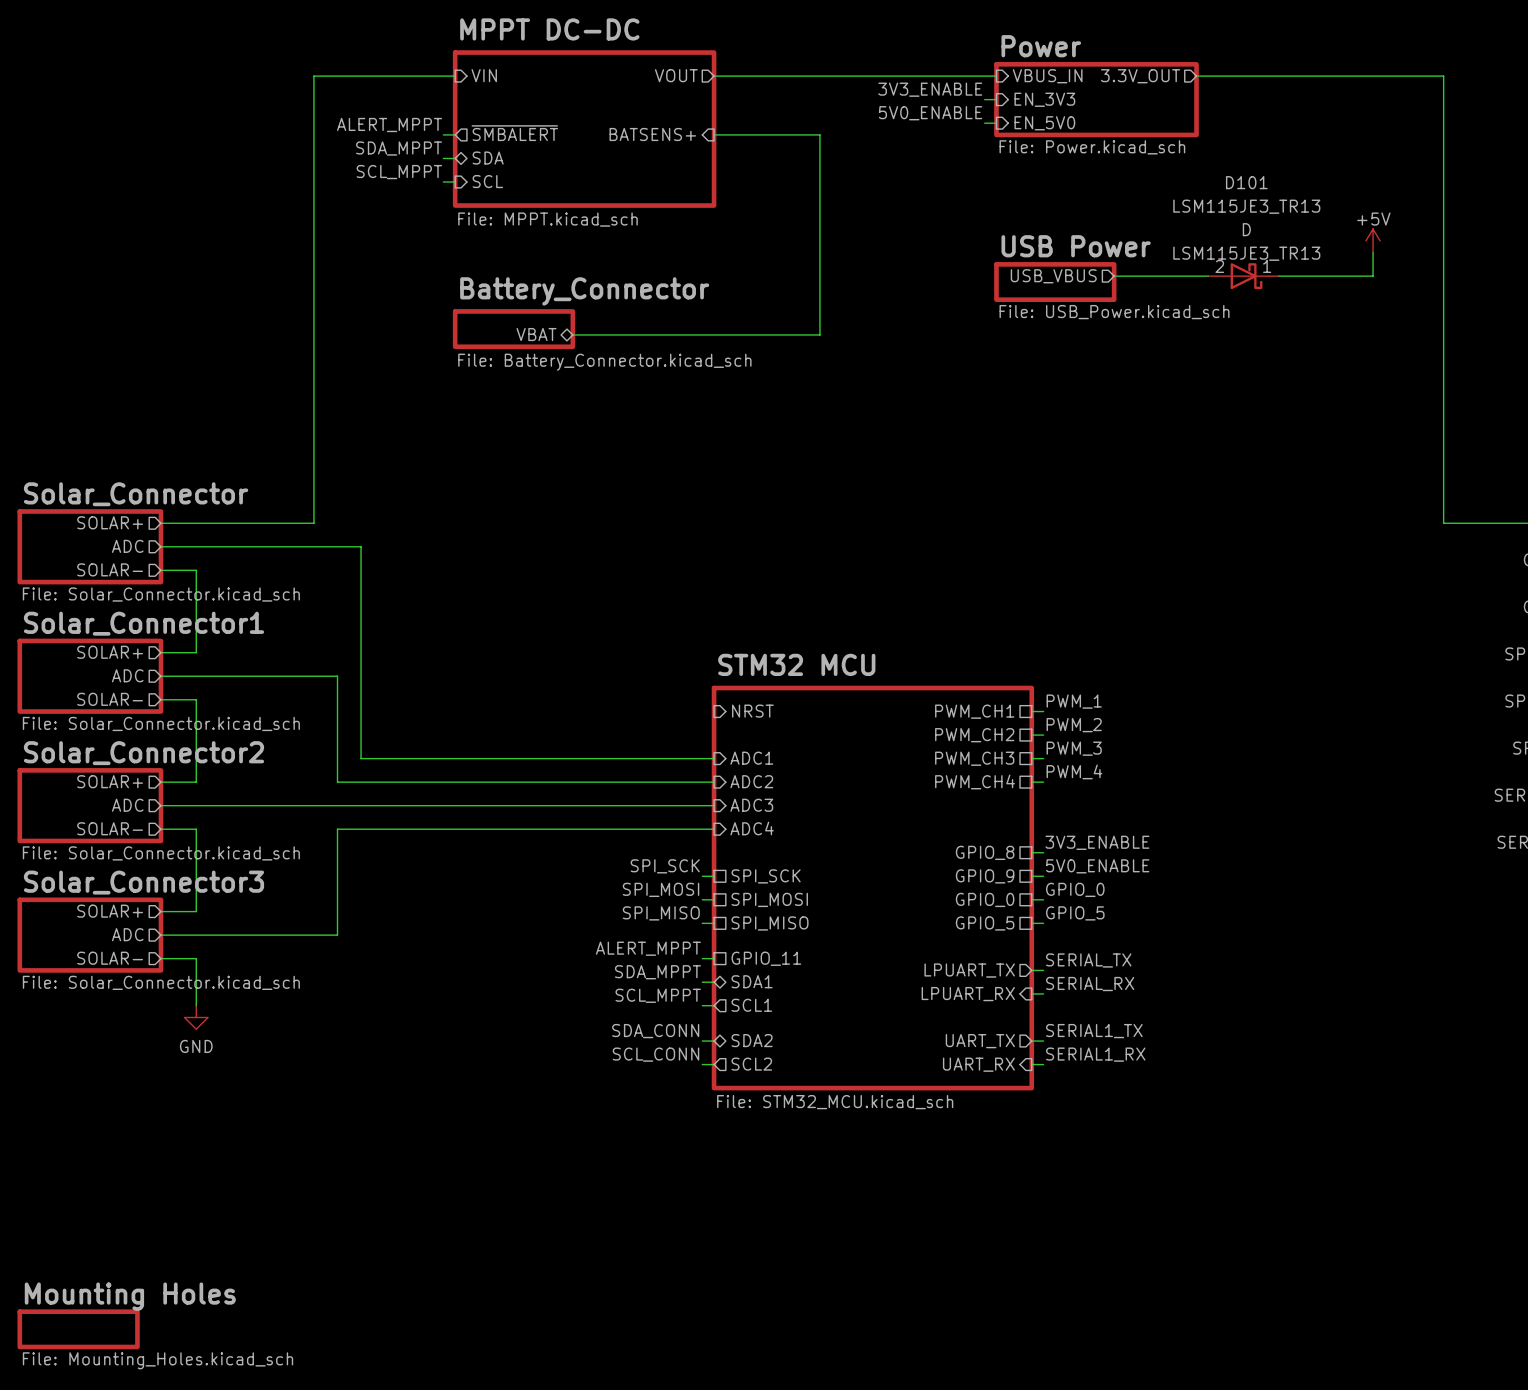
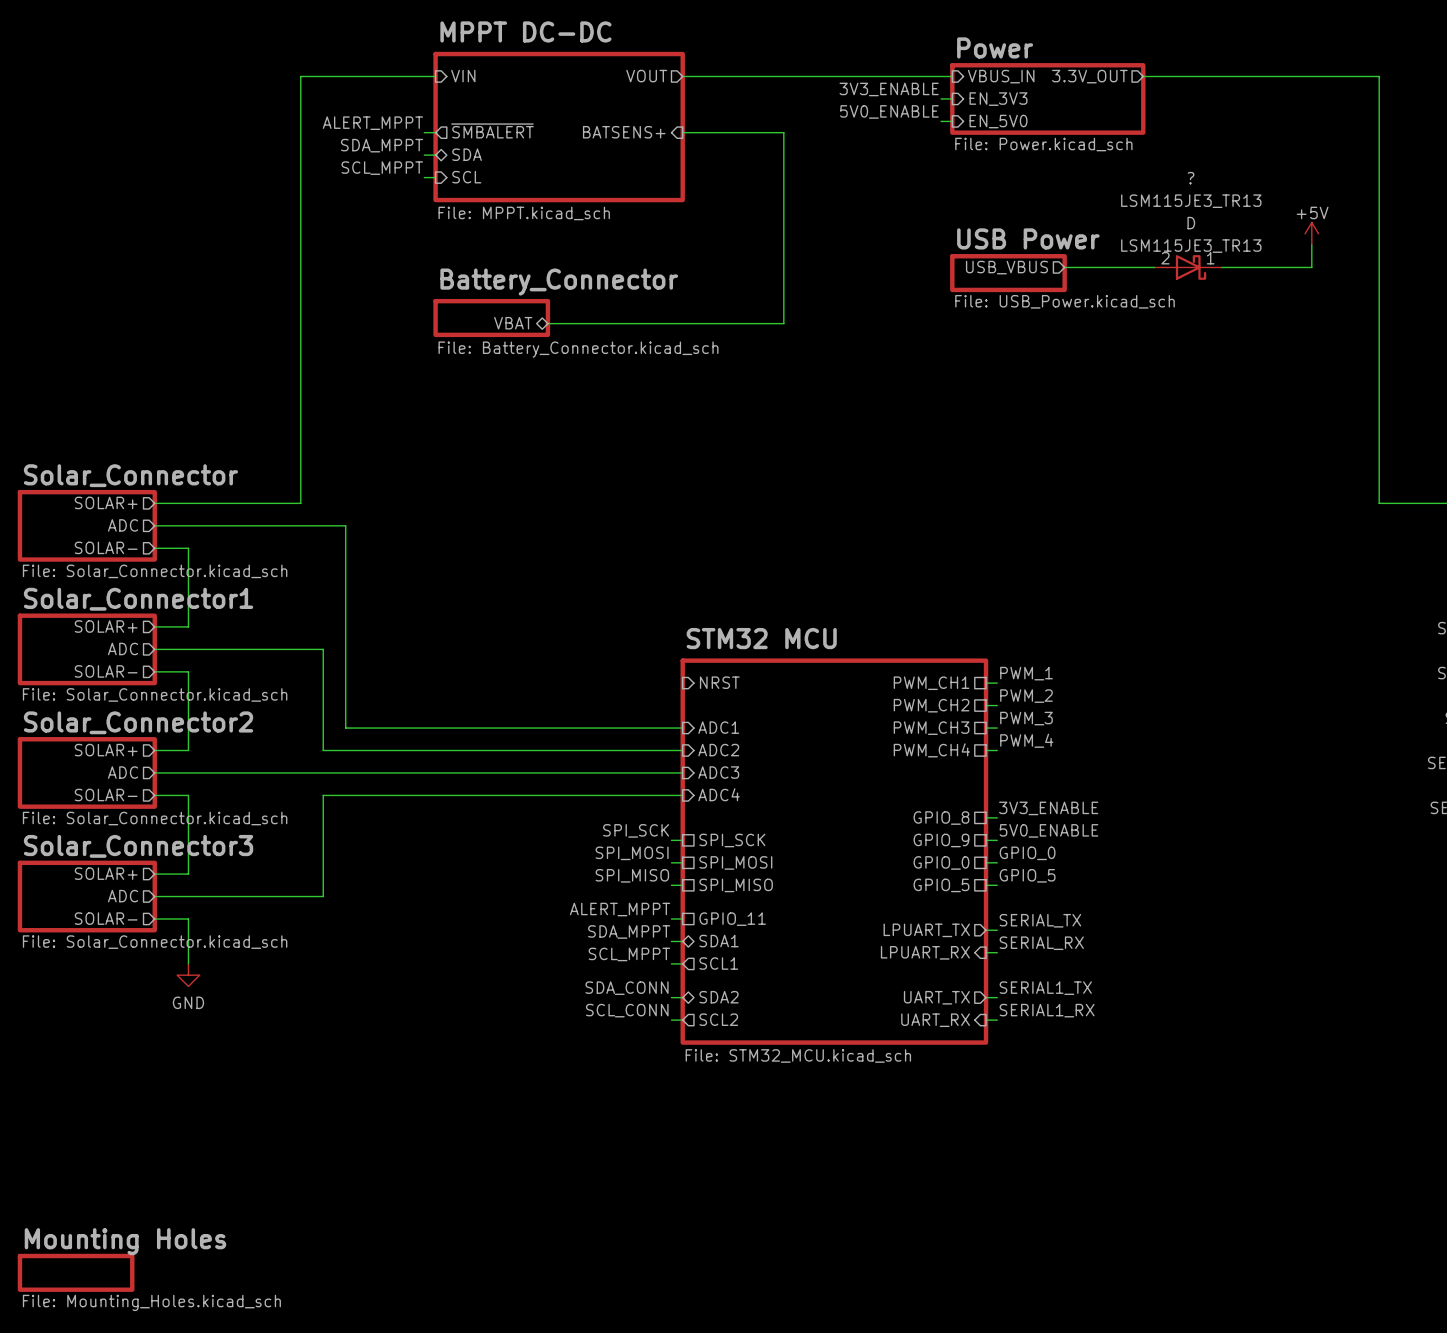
D101 name: D101 (1246, 182) -> ? (1191, 178)

